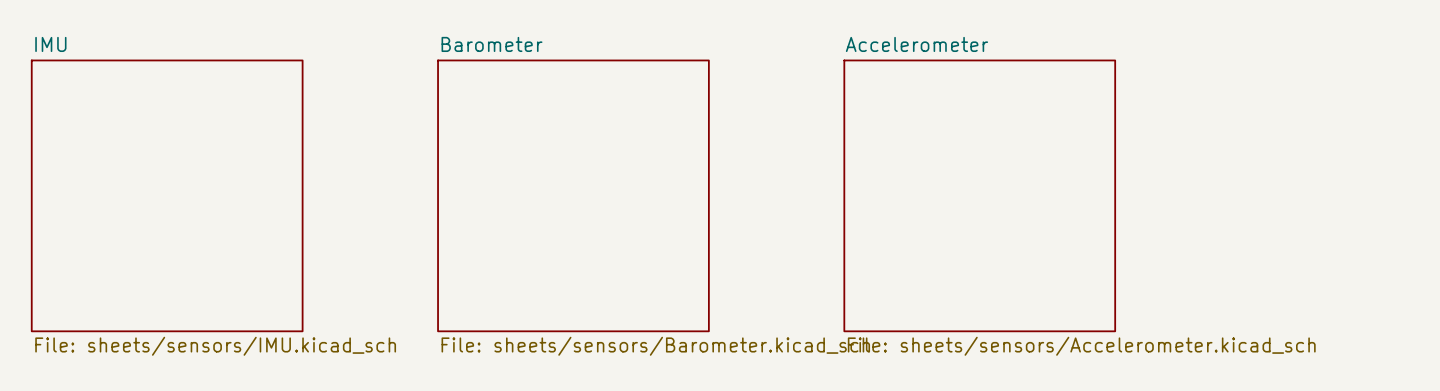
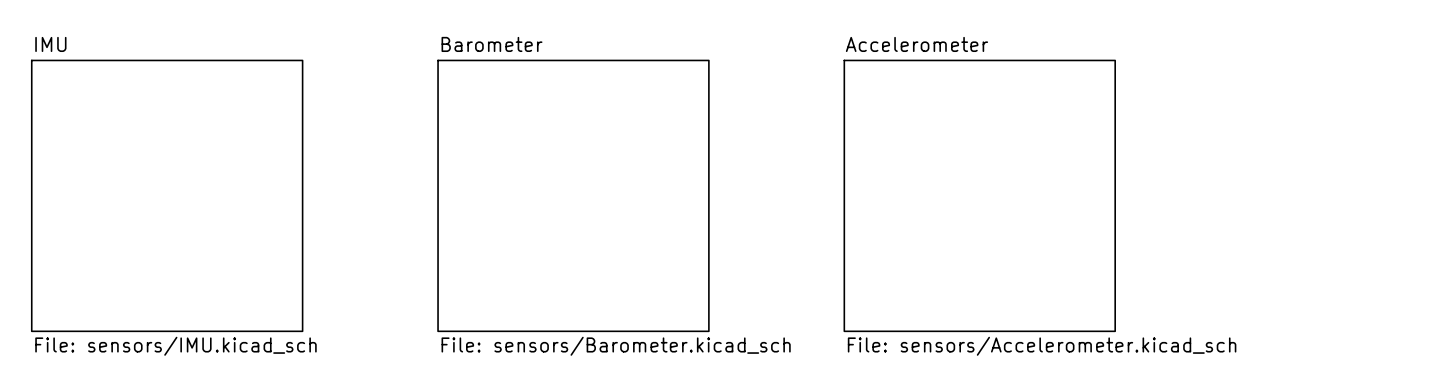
sheet IMU value: File: sheets/sensors/IMU.kicad_sch (215, 346) -> File: sensors/IMU.kicad_sch (175, 346)
sheet Barometer value: File: sheets/sensors/Barometer.kicad_sch (655, 346) -> File: sensors/Barometer.kicad_sch (616, 346)
sheet Accelerometer value: File: sheets/sensors/Accelerometer.kicad_sch (1081, 346) -> File: sensors/Accelerometer.kicad_sch (1042, 346)

